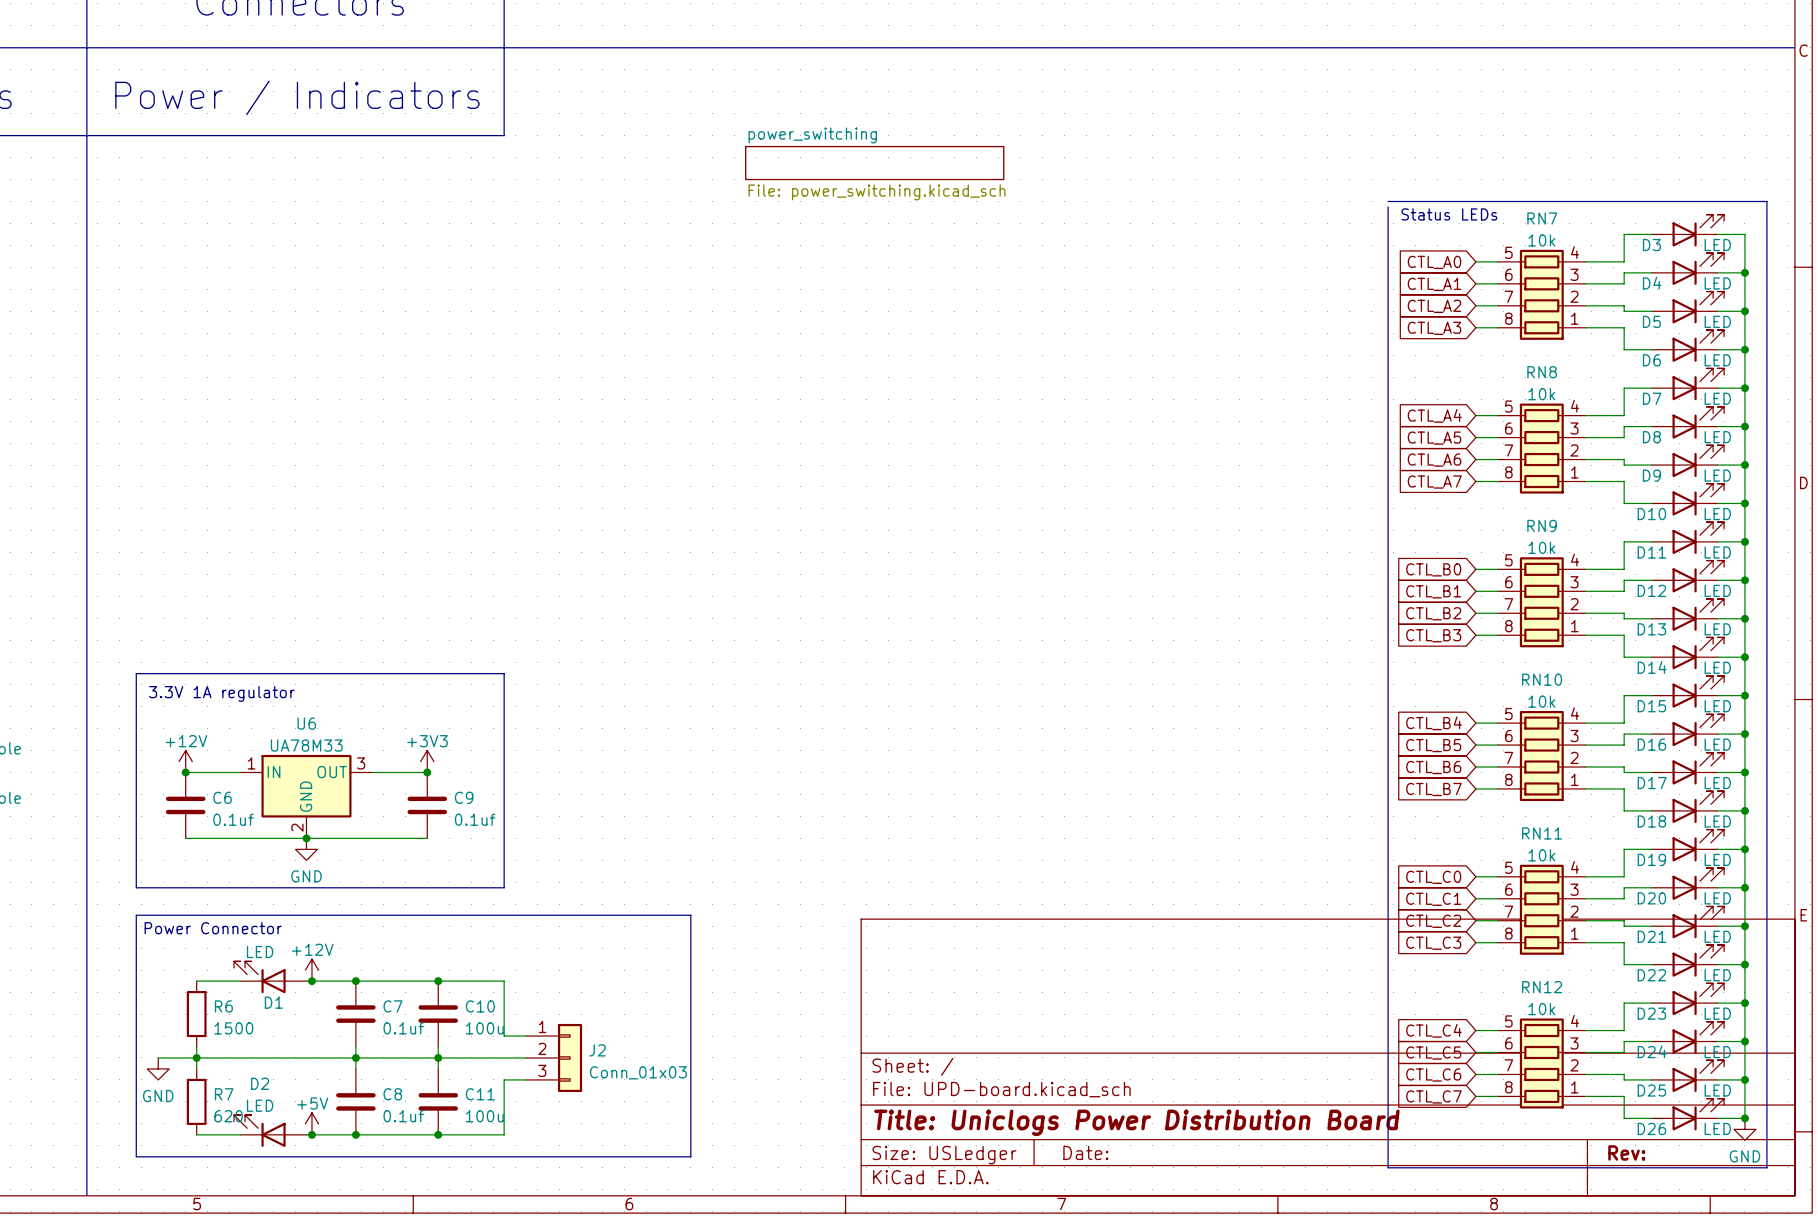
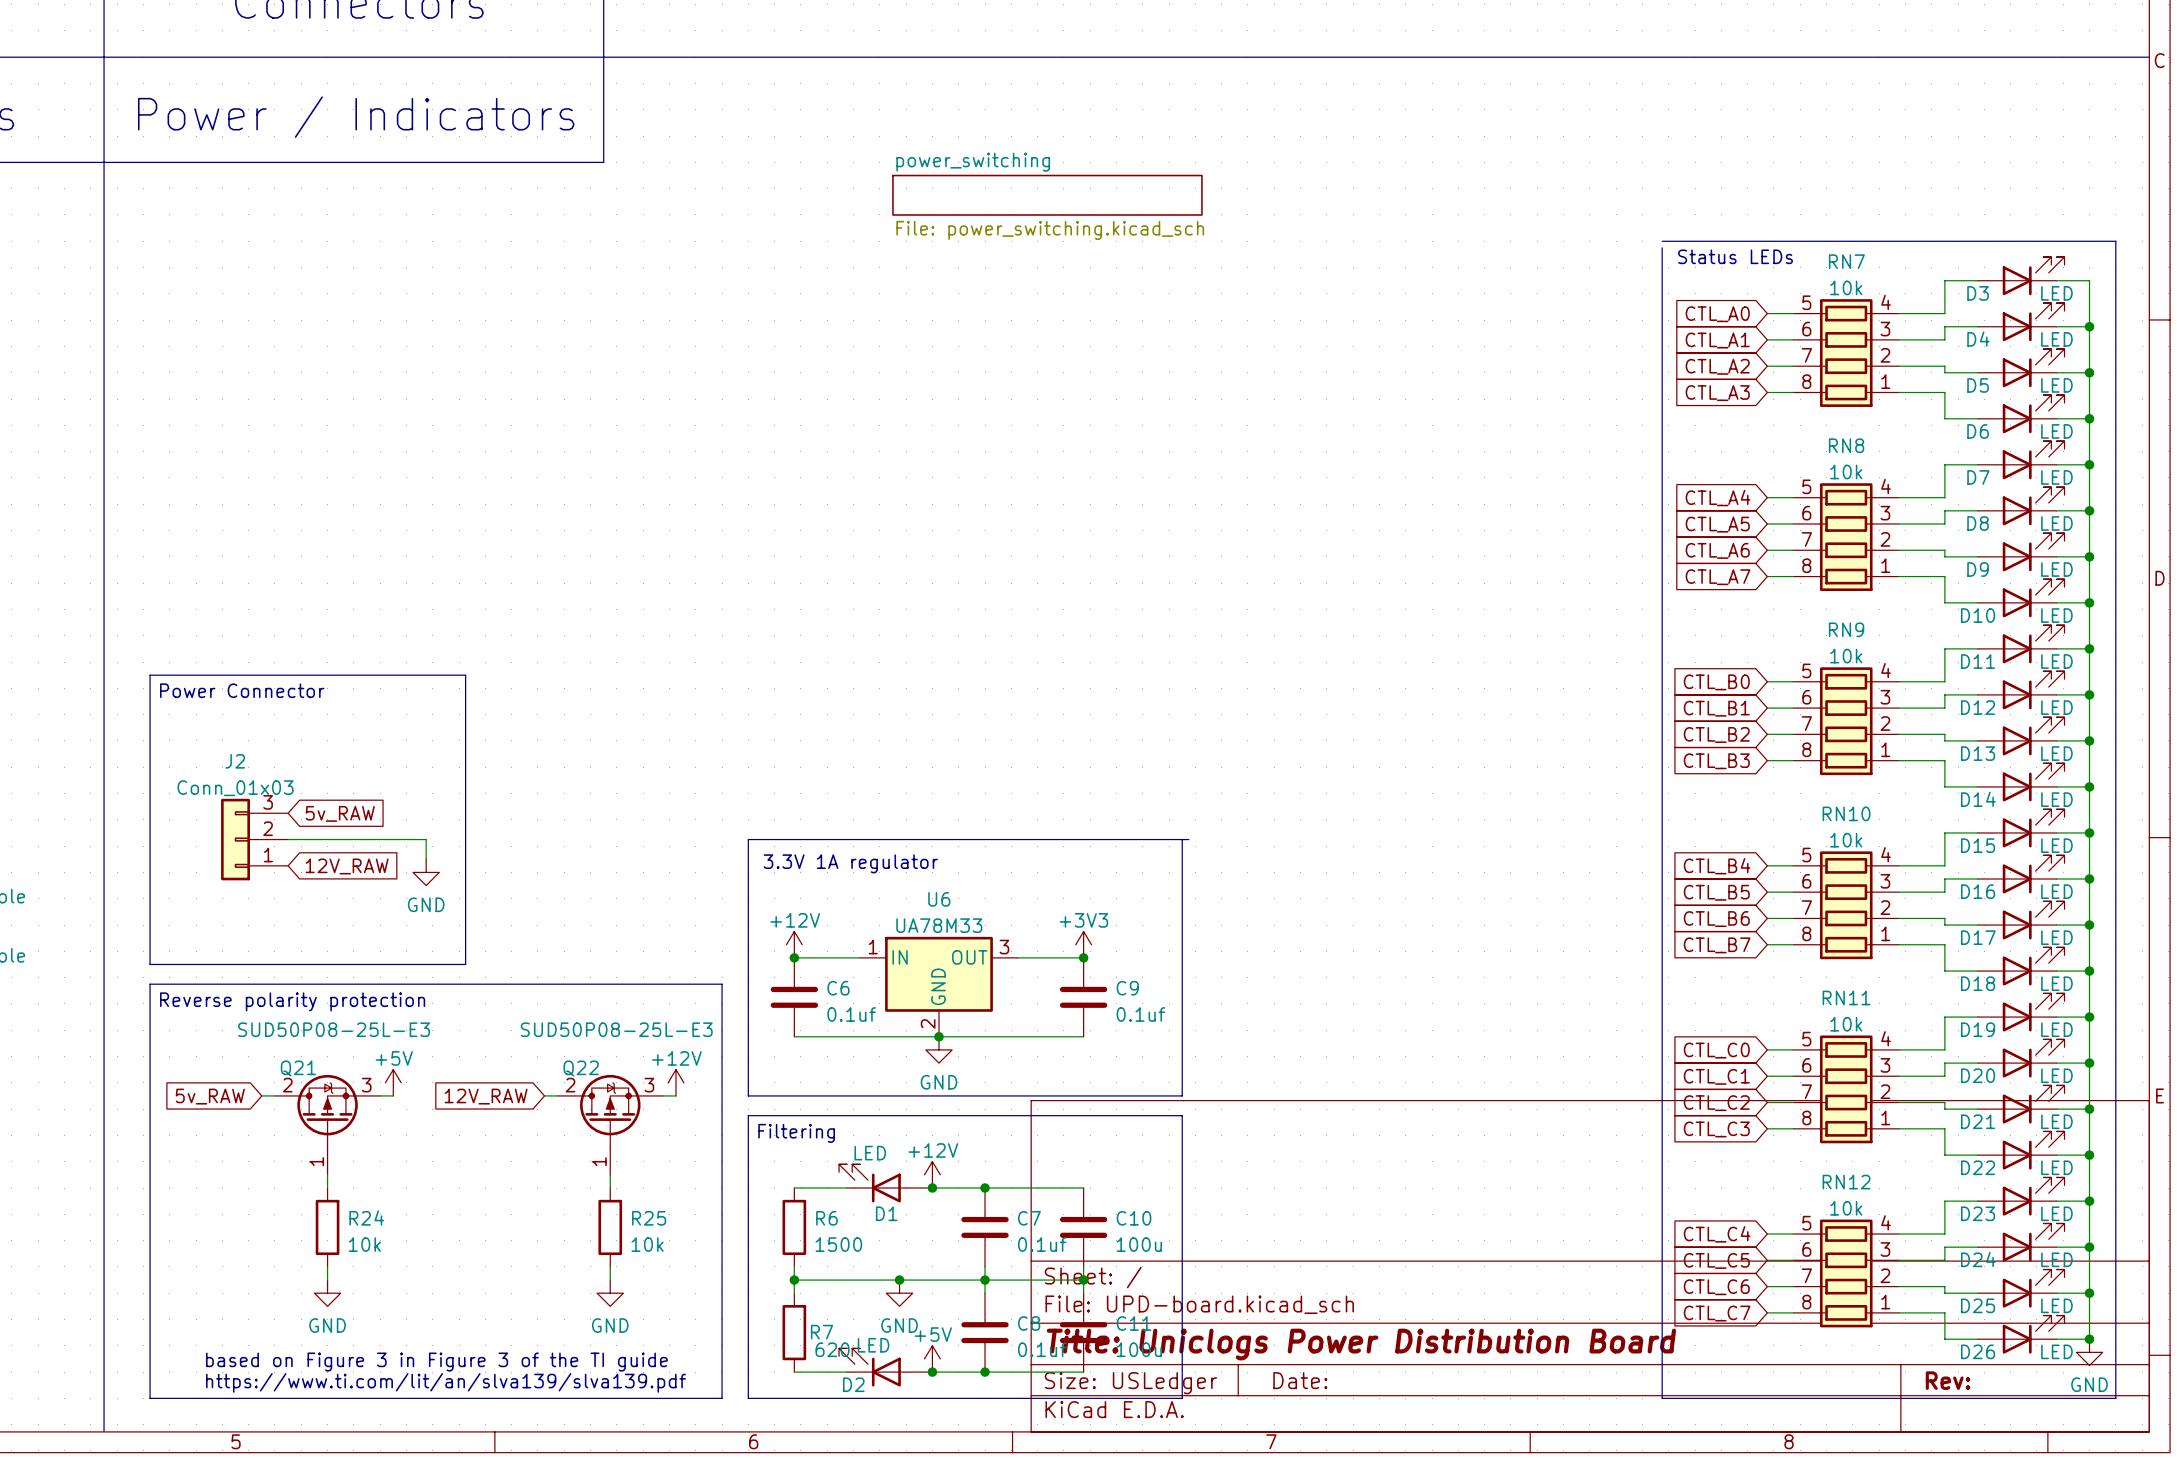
line: none -> (150, 675) (150, 964) (465, 964) (465, 675) (150, 675)
text: none -> Power Connector (242, 690)
line: (136, 673) (504, 673) (504, 887) (136, 887) (136, 673) -> none
global label: none -> 5v_RAW (340, 813)
text: 3.3V 1A regulator (221, 693) -> none
wire: none -> (288, 839) (426, 839) (426, 859)
line: none -> (1182, 839) (1182, 1095) (827, 1095)
text: none -> 3.3V 1A regulator (850, 863)
global label: none -> 12V_RAW (347, 866)
power symbol: none -> GND (426, 872)
power symbol: +12V (185, 761) -> none
power symbol: +3V3 (427, 761) -> none
wire: (185, 772) (240, 772) -> none
junction: (185, 772) -> none
wire: (372, 772) (427, 772) -> none
junction: (427, 772) -> none
power symbol: none -> +12V (794, 944)
power symbol: none -> +3V3 (1083, 944)
U6 position: (306, 796) -> (938, 986)
wire: none -> (794, 957) (860, 957)
junction: none -> (794, 957)
wire: none -> (1017, 957) (1083, 957)
junction: none -> (1083, 957)
C6 position: (185, 805) -> (794, 997)
C9 position: (427, 805) -> (1083, 997)
line: none -> (150, 984) (150, 1398) (722, 1398) (722, 984) (150, 984)
text: none -> Reverse polarity protection (292, 1001)
wire: (185, 838) (427, 838) -> none
junction: (306, 838) -> none
power symbol: GND (306, 849) -> none
wire: none -> (794, 1036) (1083, 1036)
junction: none -> (938, 1036)
power symbol: none -> GND (938, 1049)
power symbol: none -> +5V (393, 1082)
power symbol: none -> +12V (676, 1082)
global label: none -> 5v_RAW (210, 1096)
global label: none -> 12V_RAW (486, 1096)
line: (624, 915) (136, 915) (136, 1156) (690, 1156) (690, 915) -> (748, 1095) (748, 839) (1188, 839)
text: Power Connector (213, 928) -> none
line: none -> (748, 1115) (748, 1398) (1182, 1398) (1182, 1115) (748, 1115)
Q21: none -> SUD50P08-25L-E3 (327, 1124)
Q22: none -> SUD50P08-25L-E3 (610, 1124)
text: none -> Filtering (796, 1133)
power symbol: +12V (311, 970) -> none
D1 position: (270, 977) -> (882, 1183)
wire: (196, 981) (240, 981) -> none
wire: none -> (327, 1174) (327, 1188)
wire: (306, 981) (504, 981) (504, 1036) (526, 1036) -> none
junction: (311, 981) -> none
junction: (355, 981) -> none
junction: (438, 981) -> none
wire: none -> (610, 1174) (610, 1188)
power symbol: none -> +12V (932, 1174)
wire: none -> (794, 1188) (846, 1188)
wire: none -> (925, 1188) (1083, 1188)
junction: none -> (932, 1188)
junction: none -> (985, 1188)
R6 position: (196, 1014) -> (794, 1227)
C7 position: (355, 1014) -> (985, 1227)
C10 position: (438, 1014) -> (1083, 1227)
R24: none -> 10k (327, 1227)
R25: none -> 10k (610, 1227)
wire: (196, 1047) (196, 1068) -> none
wire: (355, 1047) (355, 1068) -> none
wire: (438, 1047) (438, 1068) -> none
J2 name position: J2 (597, 1050) -> J2 (235, 761)
wire: (158, 1057) (526, 1057) -> none
junction: (196, 1057) -> none
wire: none -> (327, 1266) (327, 1280)
junction: (355, 1057) -> none
junction: (438, 1057) -> none
wire: none -> (610, 1266) (610, 1280)
J2 position: (554, 1057) -> (254, 839)
J2 rotation: 0° (570, 1057) -> 180° (235, 839)
wire: none -> (794, 1266) (794, 1293)
wire: none -> (985, 1266) (985, 1293)
wire: none -> (1083, 1266) (1083, 1293)
power symbol position: GND (158, 1068) -> GND (327, 1293)
wire: none -> (794, 1280) (1083, 1280)
junction: none -> (794, 1280)
junction: none -> (899, 1280)
junction: none -> (985, 1280)
junction: none -> (1083, 1280)
J2 value position: Conn_01x03 (638, 1072) -> Conn_01x03 (235, 788)
power symbol: none -> GND (610, 1293)
wire: (526, 1079) (504, 1079) (504, 1134) (306, 1134) -> none
power symbol: none -> GND (899, 1293)
D2 name position: D2 (260, 1083) -> D2 (853, 1384)
R7 name position: R7 (224, 1094) -> R7 (821, 1332)
R7 position: (196, 1101) -> (794, 1332)
C8 position: (355, 1101) -> (985, 1332)
C11 position: (438, 1101) -> (1083, 1332)
D2 value position: LED (260, 1105) -> LED (873, 1345)
power symbol: +5V (311, 1123) -> none
D2 position: (270, 1131) -> (882, 1367)
wire: (196, 1134) (240, 1134) -> none
junction: (311, 1134) -> none
junction: (355, 1134) -> none
junction: (438, 1134) -> none
power symbol: none -> +5V (932, 1358)
text: none -> based on Figure 3 in Figure 3 of the TI guide (436, 1362)
wire: none -> (794, 1372) (846, 1372)
wire: none -> (925, 1372) (1083, 1372)
junction: none -> (932, 1372)
junction: none -> (985, 1372)
text: none -> https://www.ti.com/lit/an/slva139/slva139.pdf (446, 1382)

